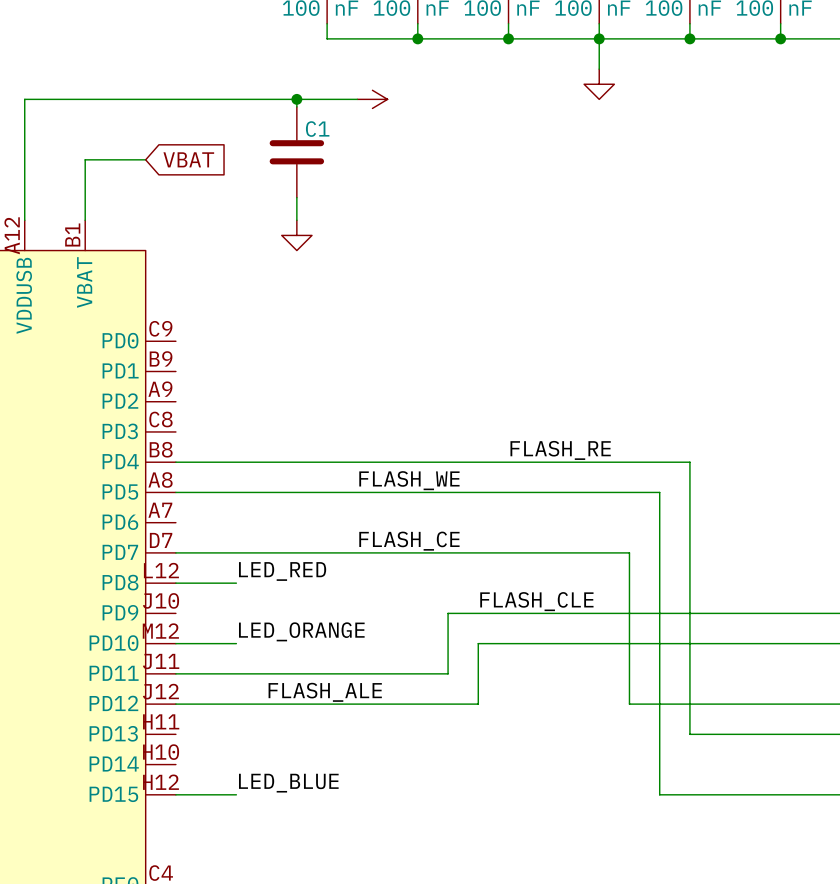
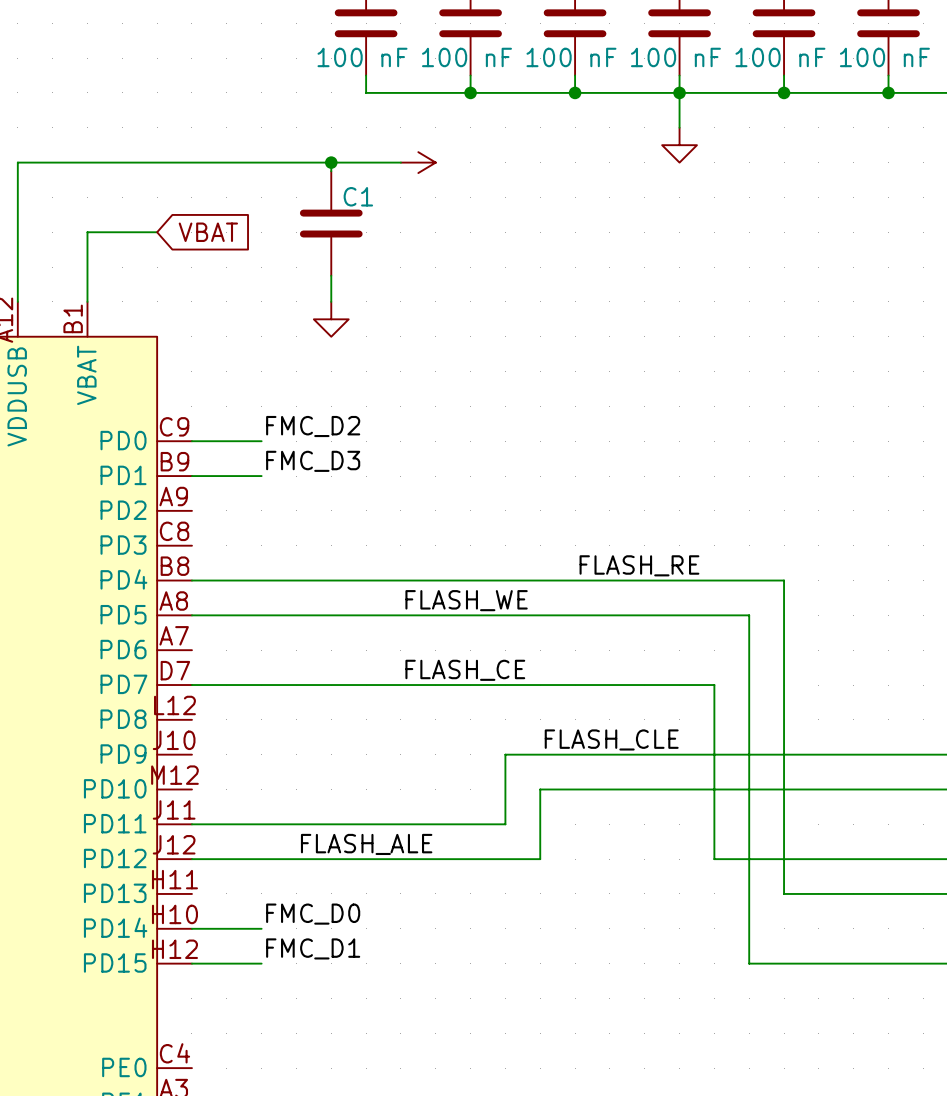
label: none -> FMC_D2 (313, 426)
wire: none -> (191, 441) (261, 441)
label: none -> FMC_D3 (313, 461)
label: LED_RED (282, 571) -> none
wire: (175, 583) (236, 583) -> (191, 476) (261, 476)
label: LED_ORANGE (301, 631) -> none
wire: (175, 643) (236, 643) -> (191, 928) (261, 928)
label: none -> FMC_D0 (313, 914)
label: LED_BLUE (288, 783) -> FMC_D1 (313, 948)

